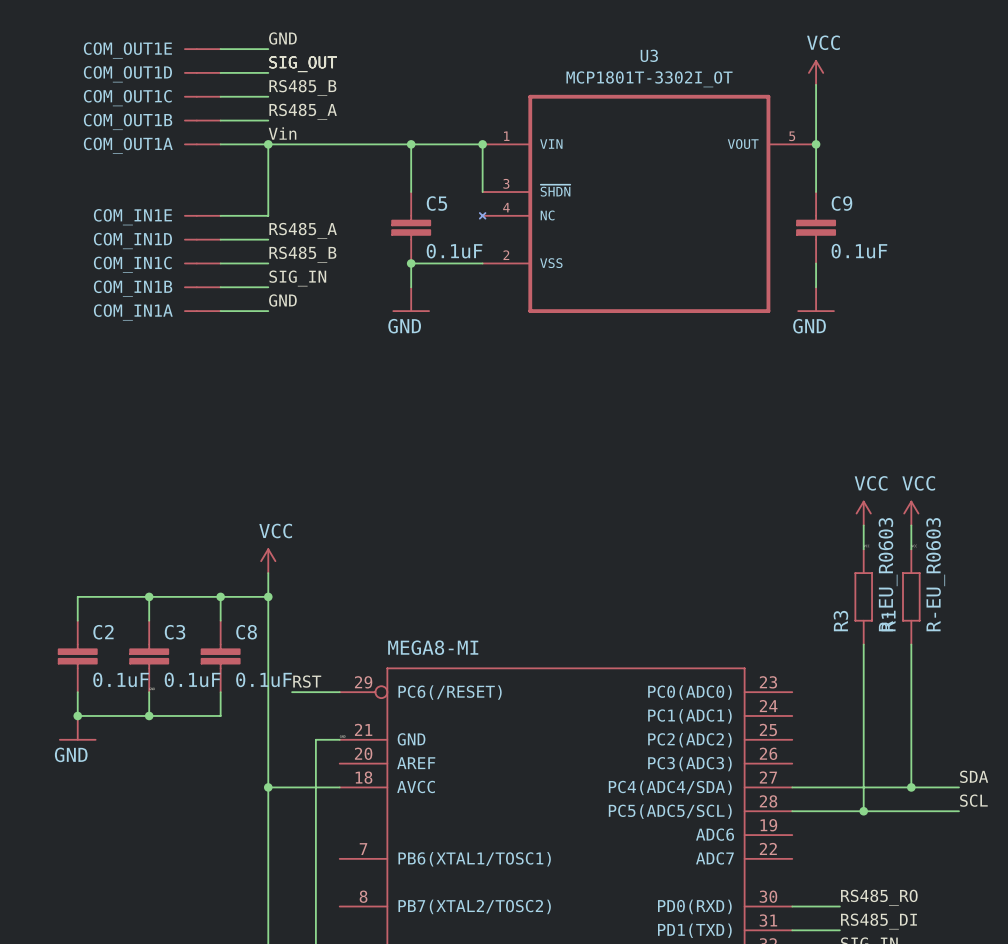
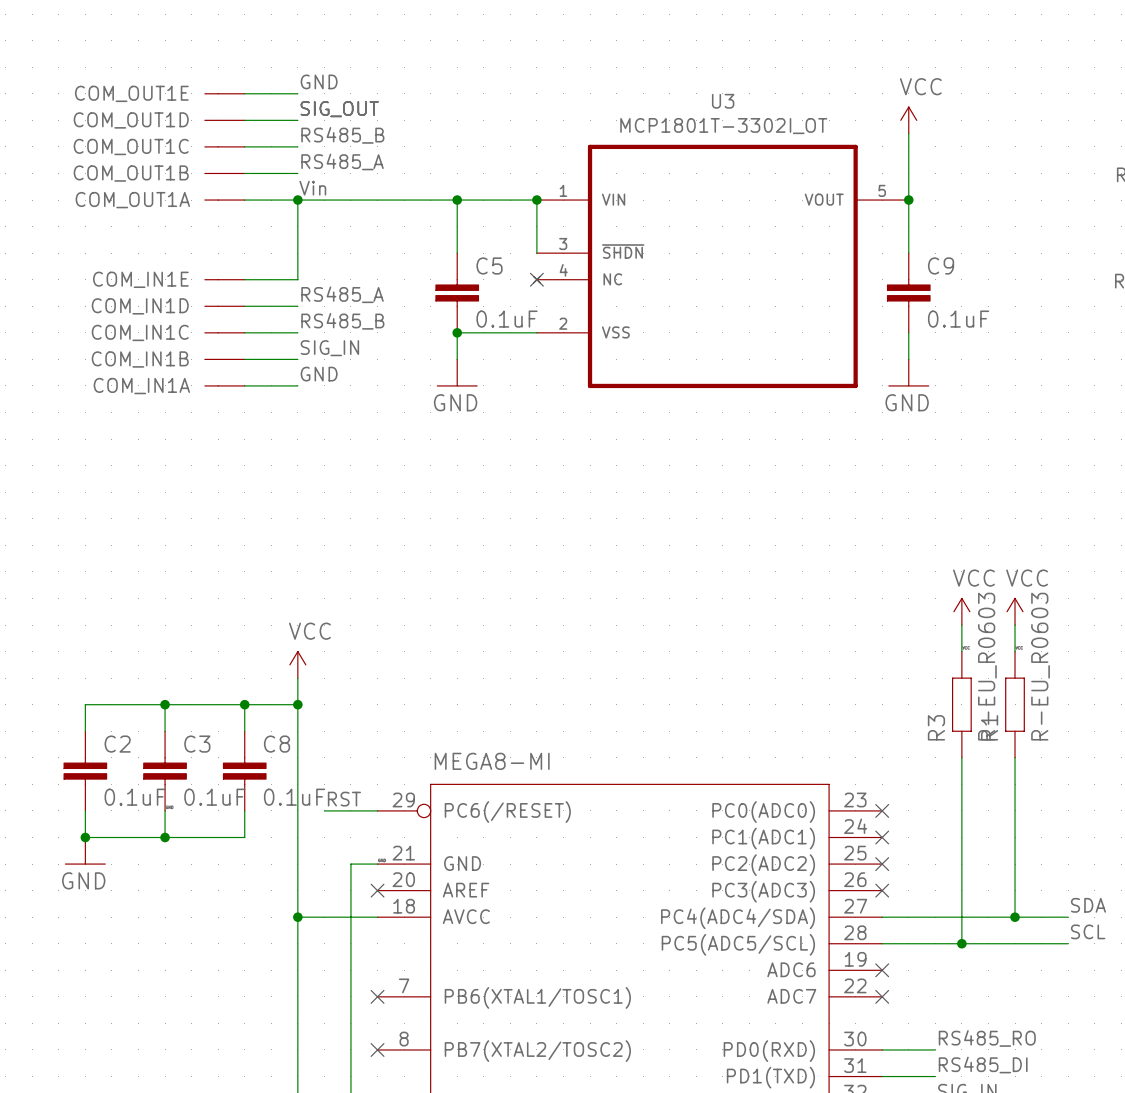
no-connect mark: none -> (536, 279)
no-connect mark: none -> (882, 810)
no-connect mark: none -> (882, 837)
no-connect mark: none -> (882, 864)
no-connect mark: none -> (377, 890)
no-connect mark: none -> (882, 890)
no-connect mark: none -> (882, 970)
no-connect mark: none -> (377, 996)
no-connect mark: none -> (882, 996)
no-connect mark: none -> (377, 1049)

